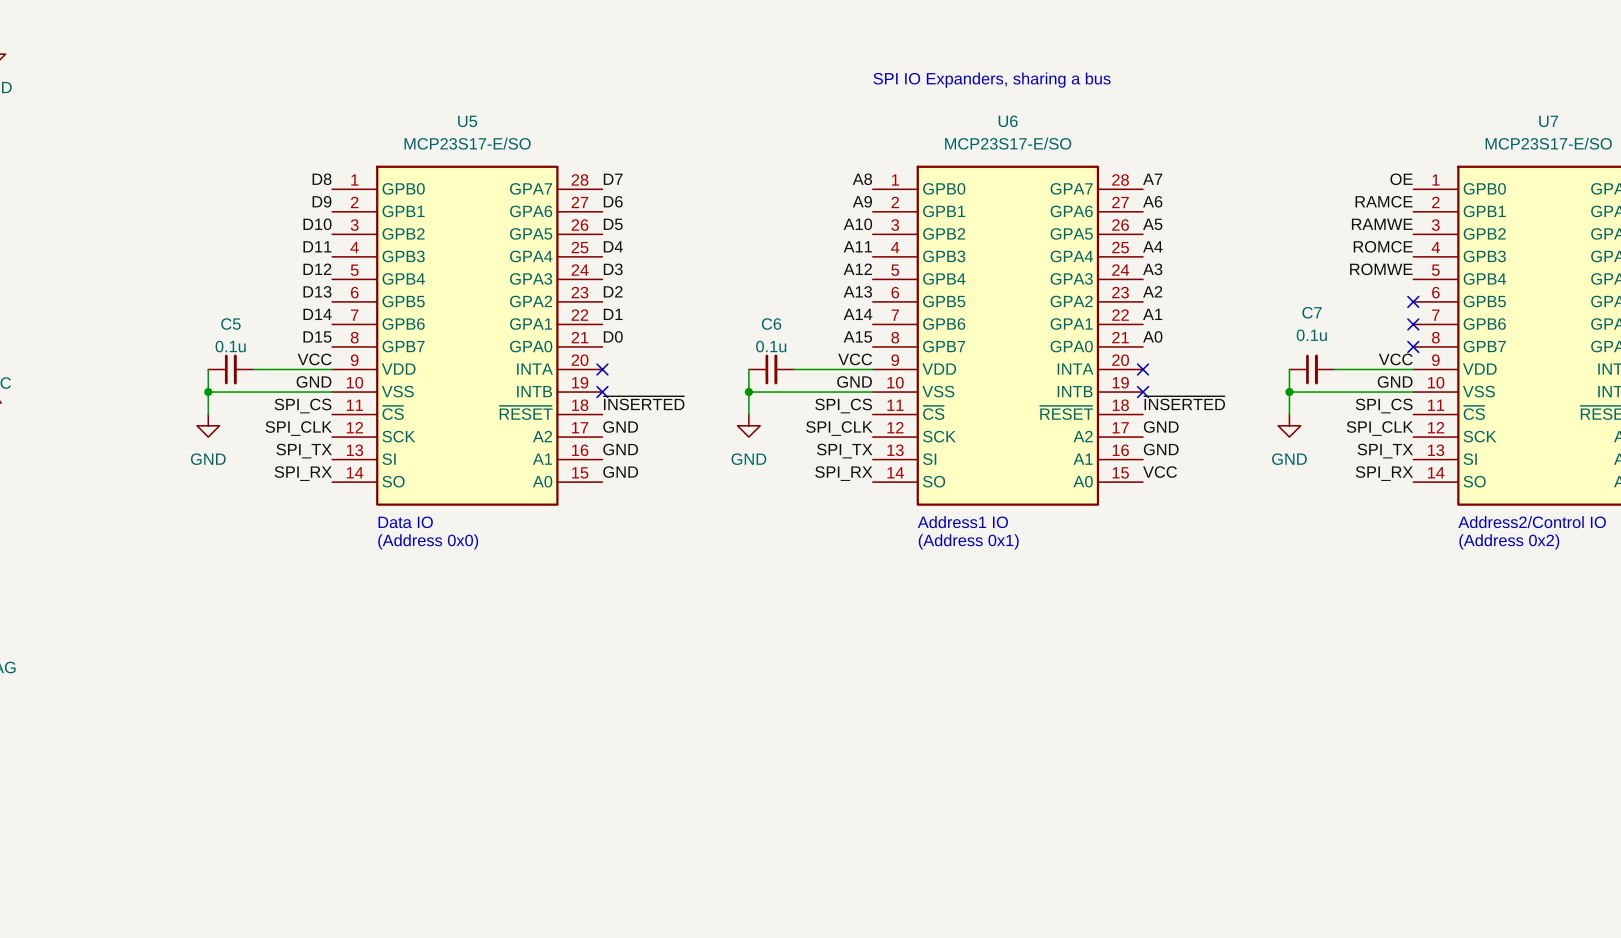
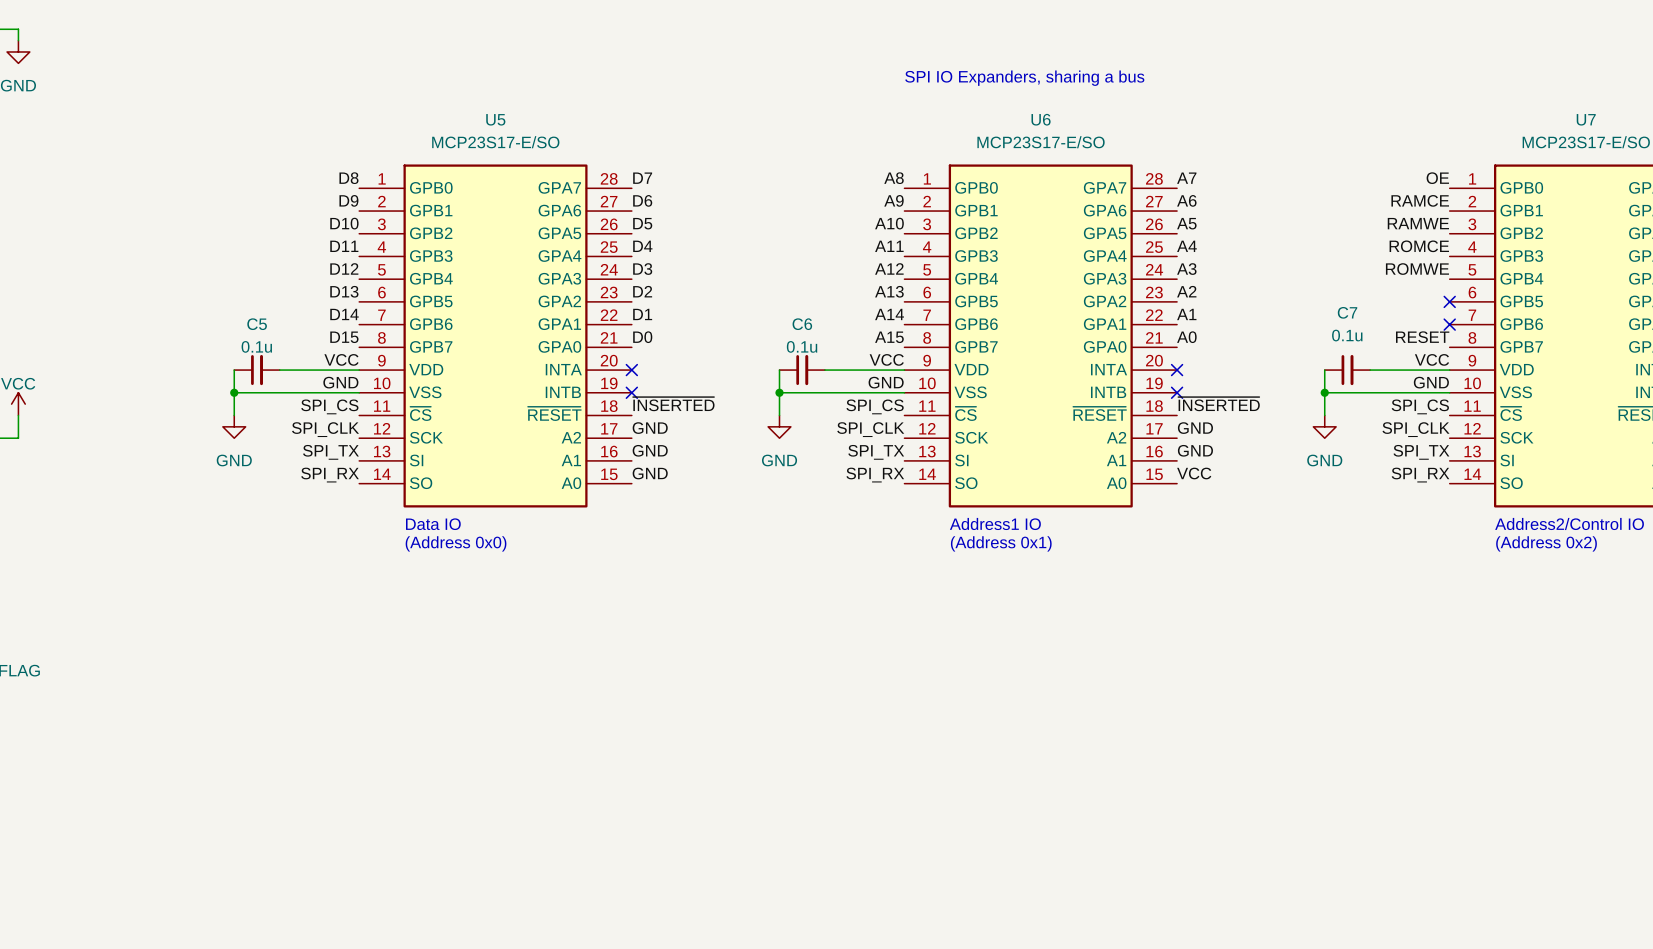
label: none -> RESET (1422, 337)
no-connect mark: (1413, 346) -> none

